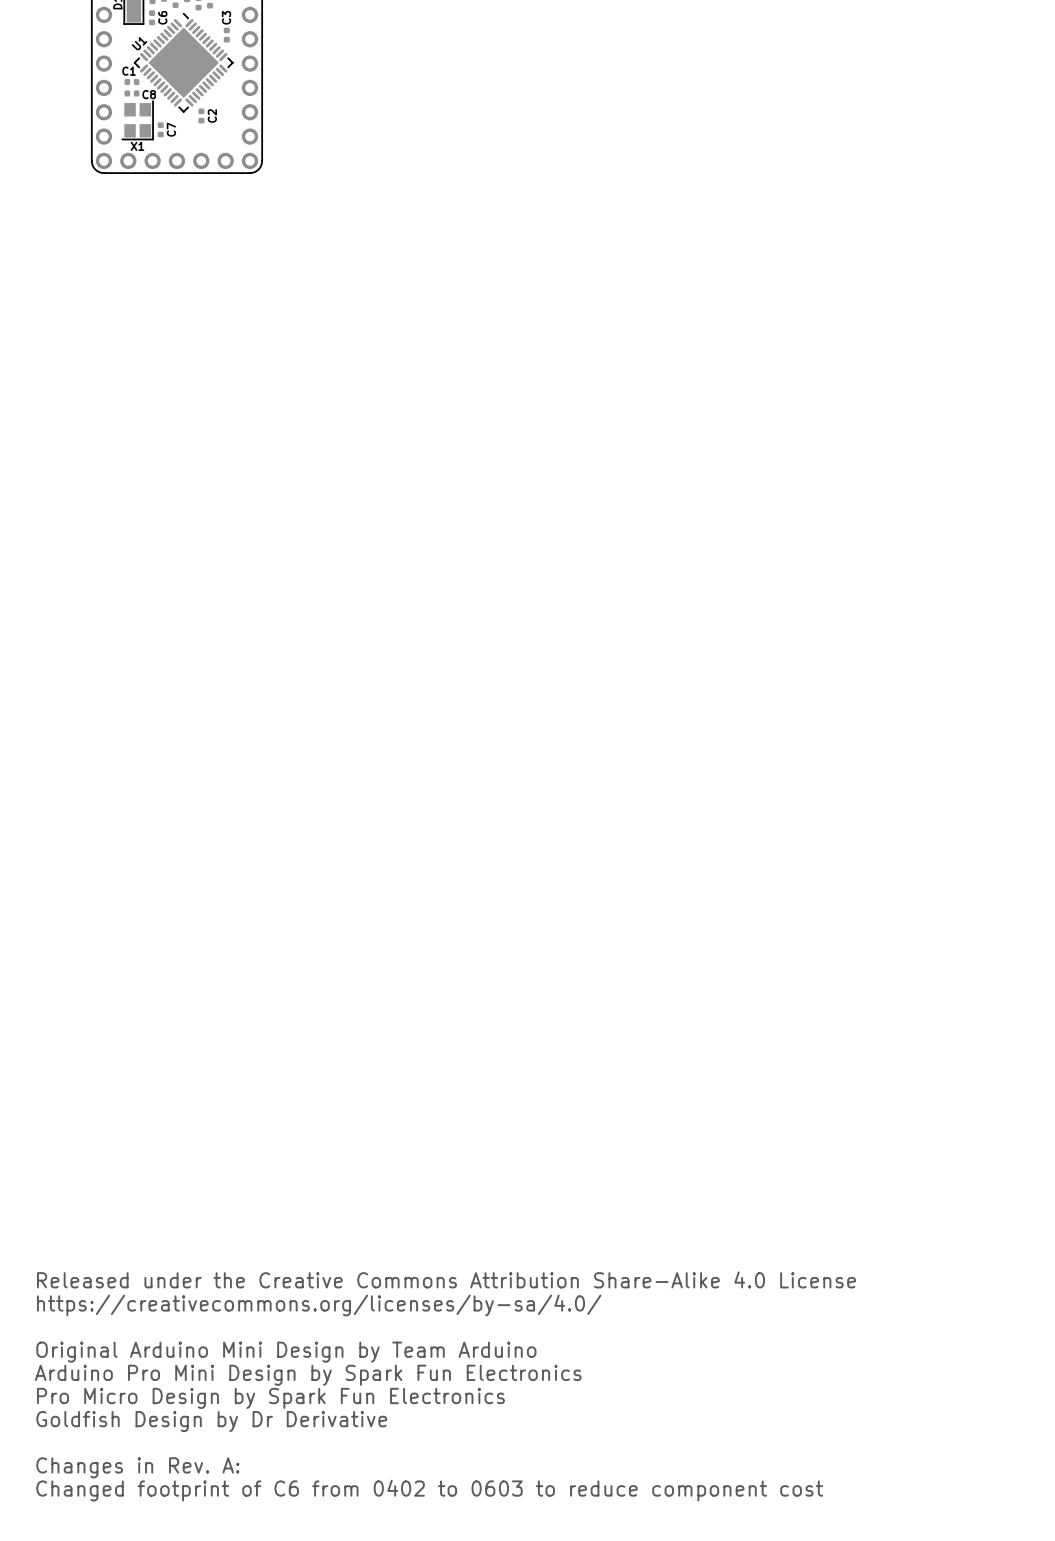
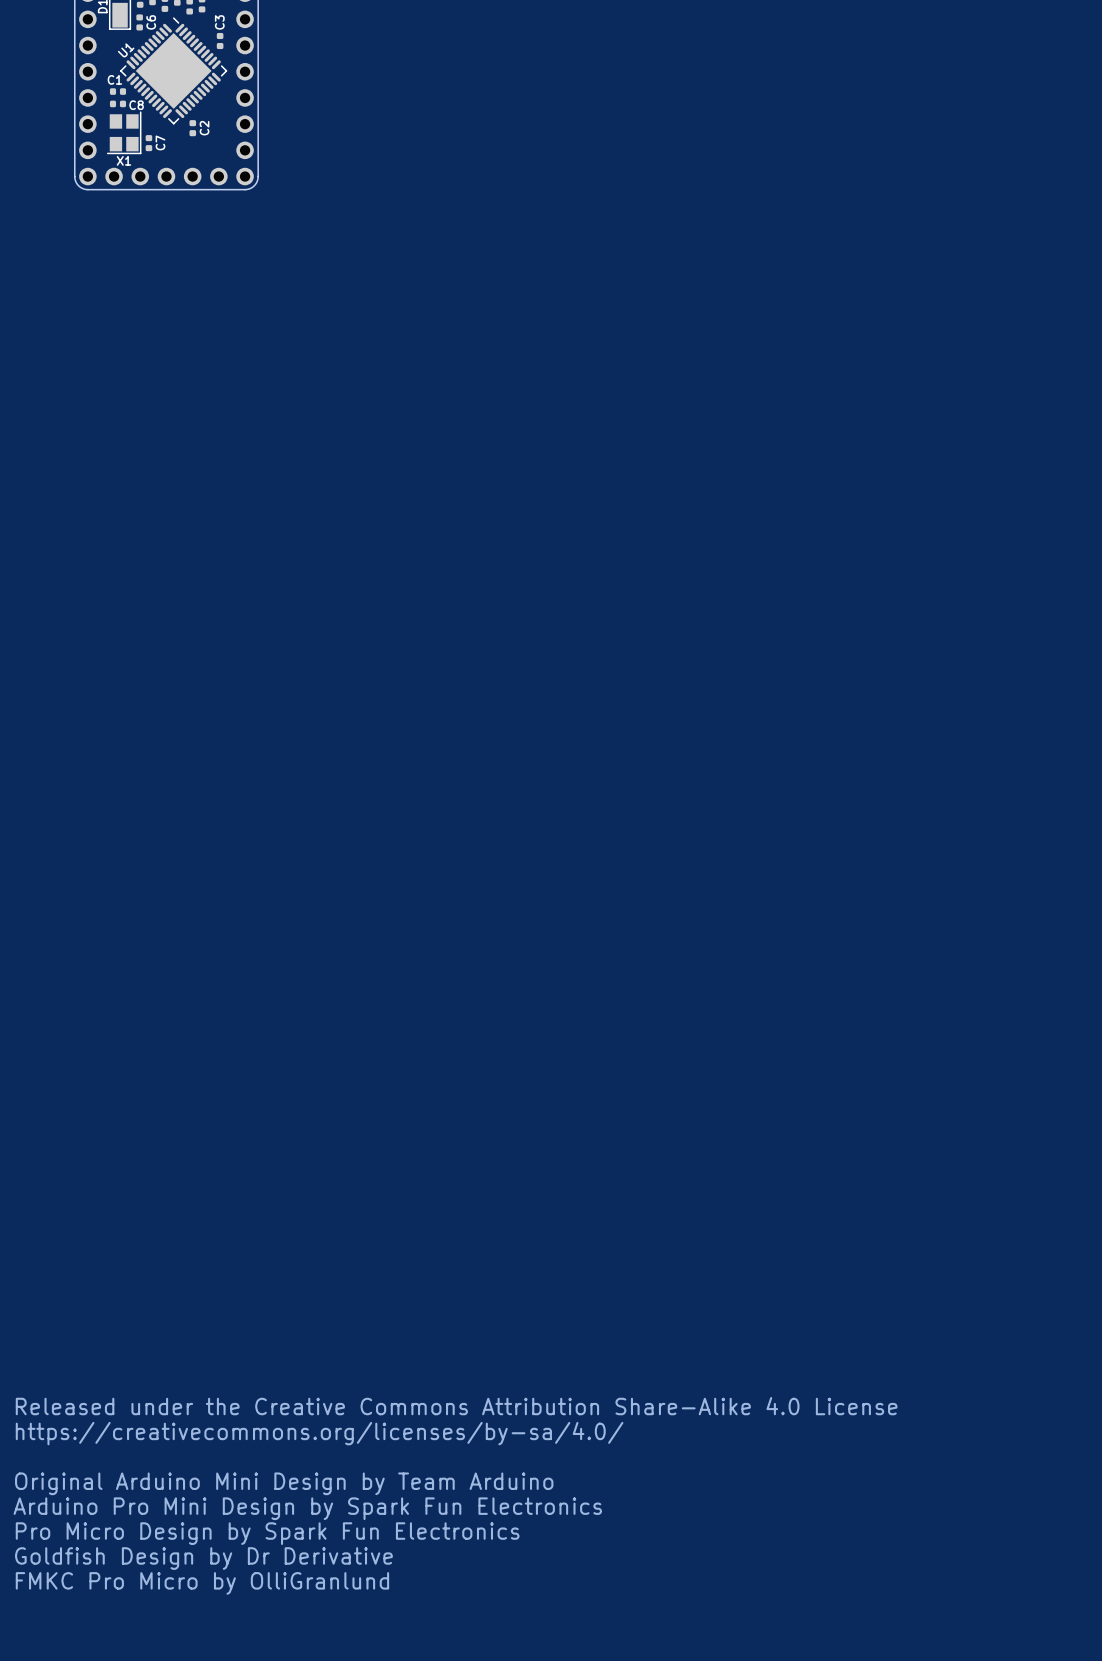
text: Released under the Creative Commons Attribution Share-Alike 4.0 License (446, 1279) -> none
text: https://creativecommons.org/licenses/by-sa/4.0/ (319, 1305) -> Released under the Creative Commons Attribution Share-Alike 4.0 License (456, 1406)
text: none -> https://creativecommons.org/licenses/by-sa/4.0/ (319, 1433)
text: Original Arduino Mini Design by Team Arduino (286, 1352) -> none
text: Arduino Pro Mini Design by Spark Fun Electronics (308, 1375) -> Original Arduino Mini Design by Team Arduino (284, 1483)
text: Pro Micro Design by Spark Fun Electronics (270, 1398) -> Arduino Pro Mini Design by Spark Fun Electronics (307, 1508)
text: Goldfish Design by Dr Derivative (211, 1421) -> Pro Micro Design by Spark Fun Electronics (267, 1533)
text: none -> Goldfish Design by Dr Derivative (203, 1558)
text: Changes in Rev. A: (137, 1467) -> FMKC Pro Micro by OlliGranlund (202, 1583)
text: Changed footprint of C6 from 0402 to 0603 to reduce component cost (429, 1490) -> none

